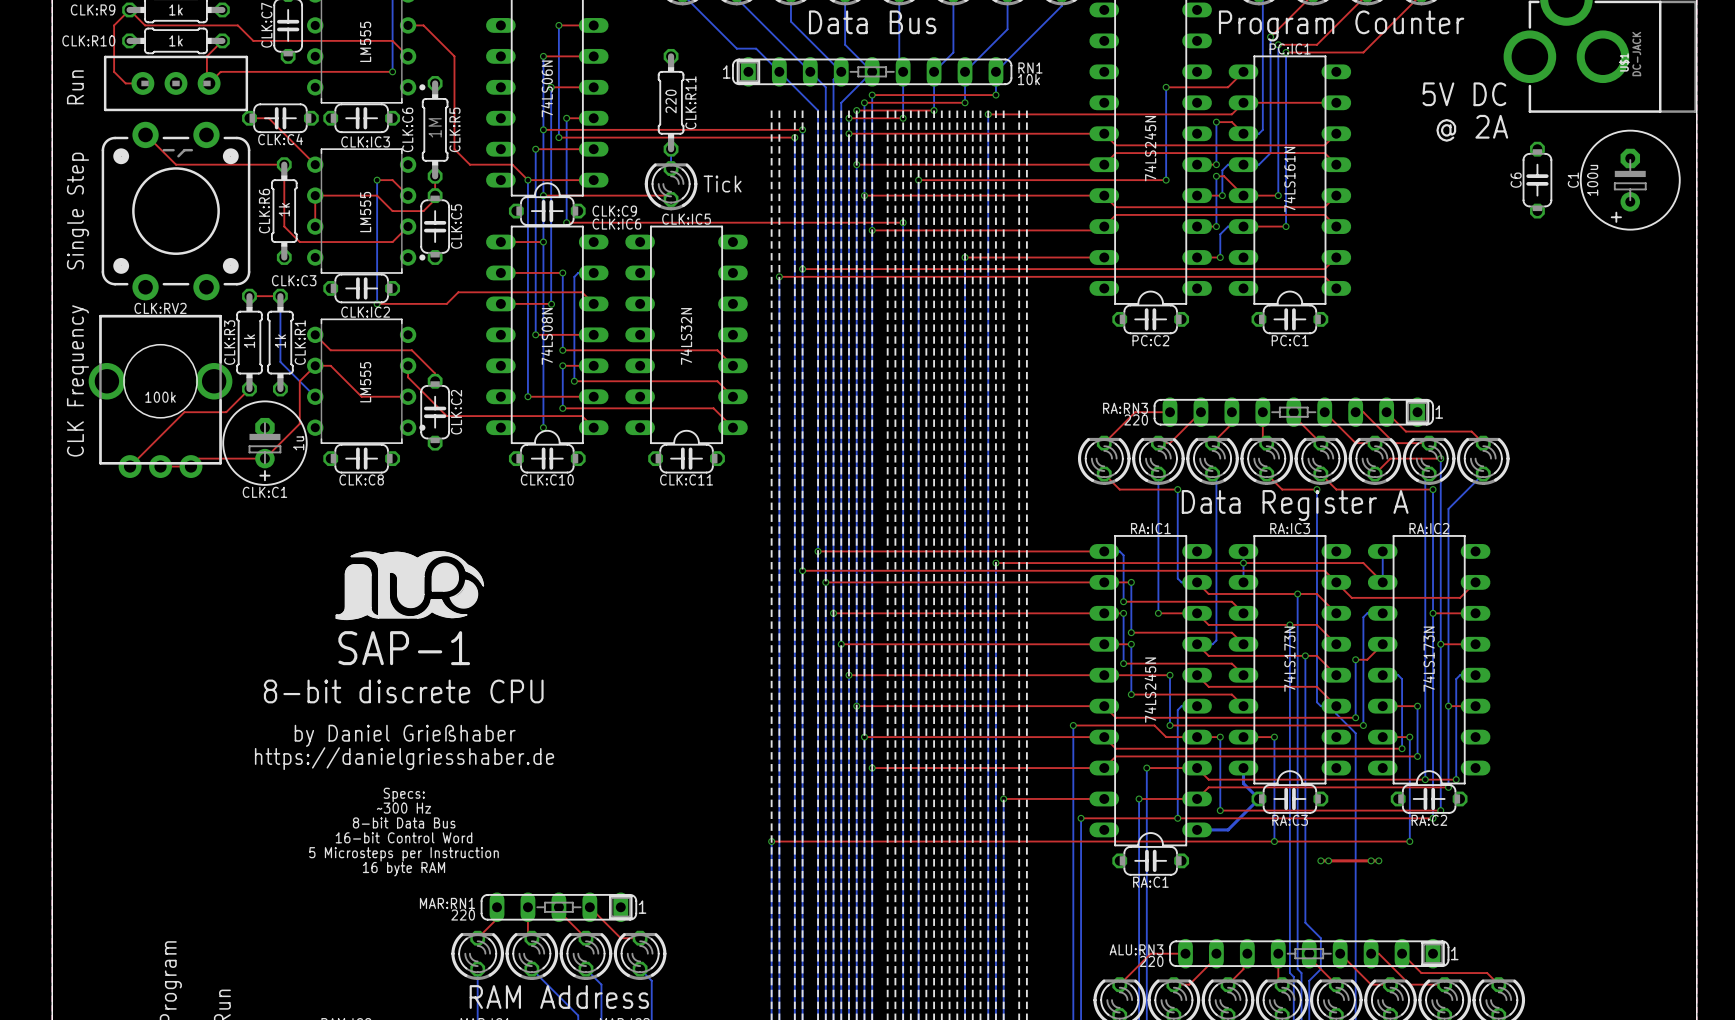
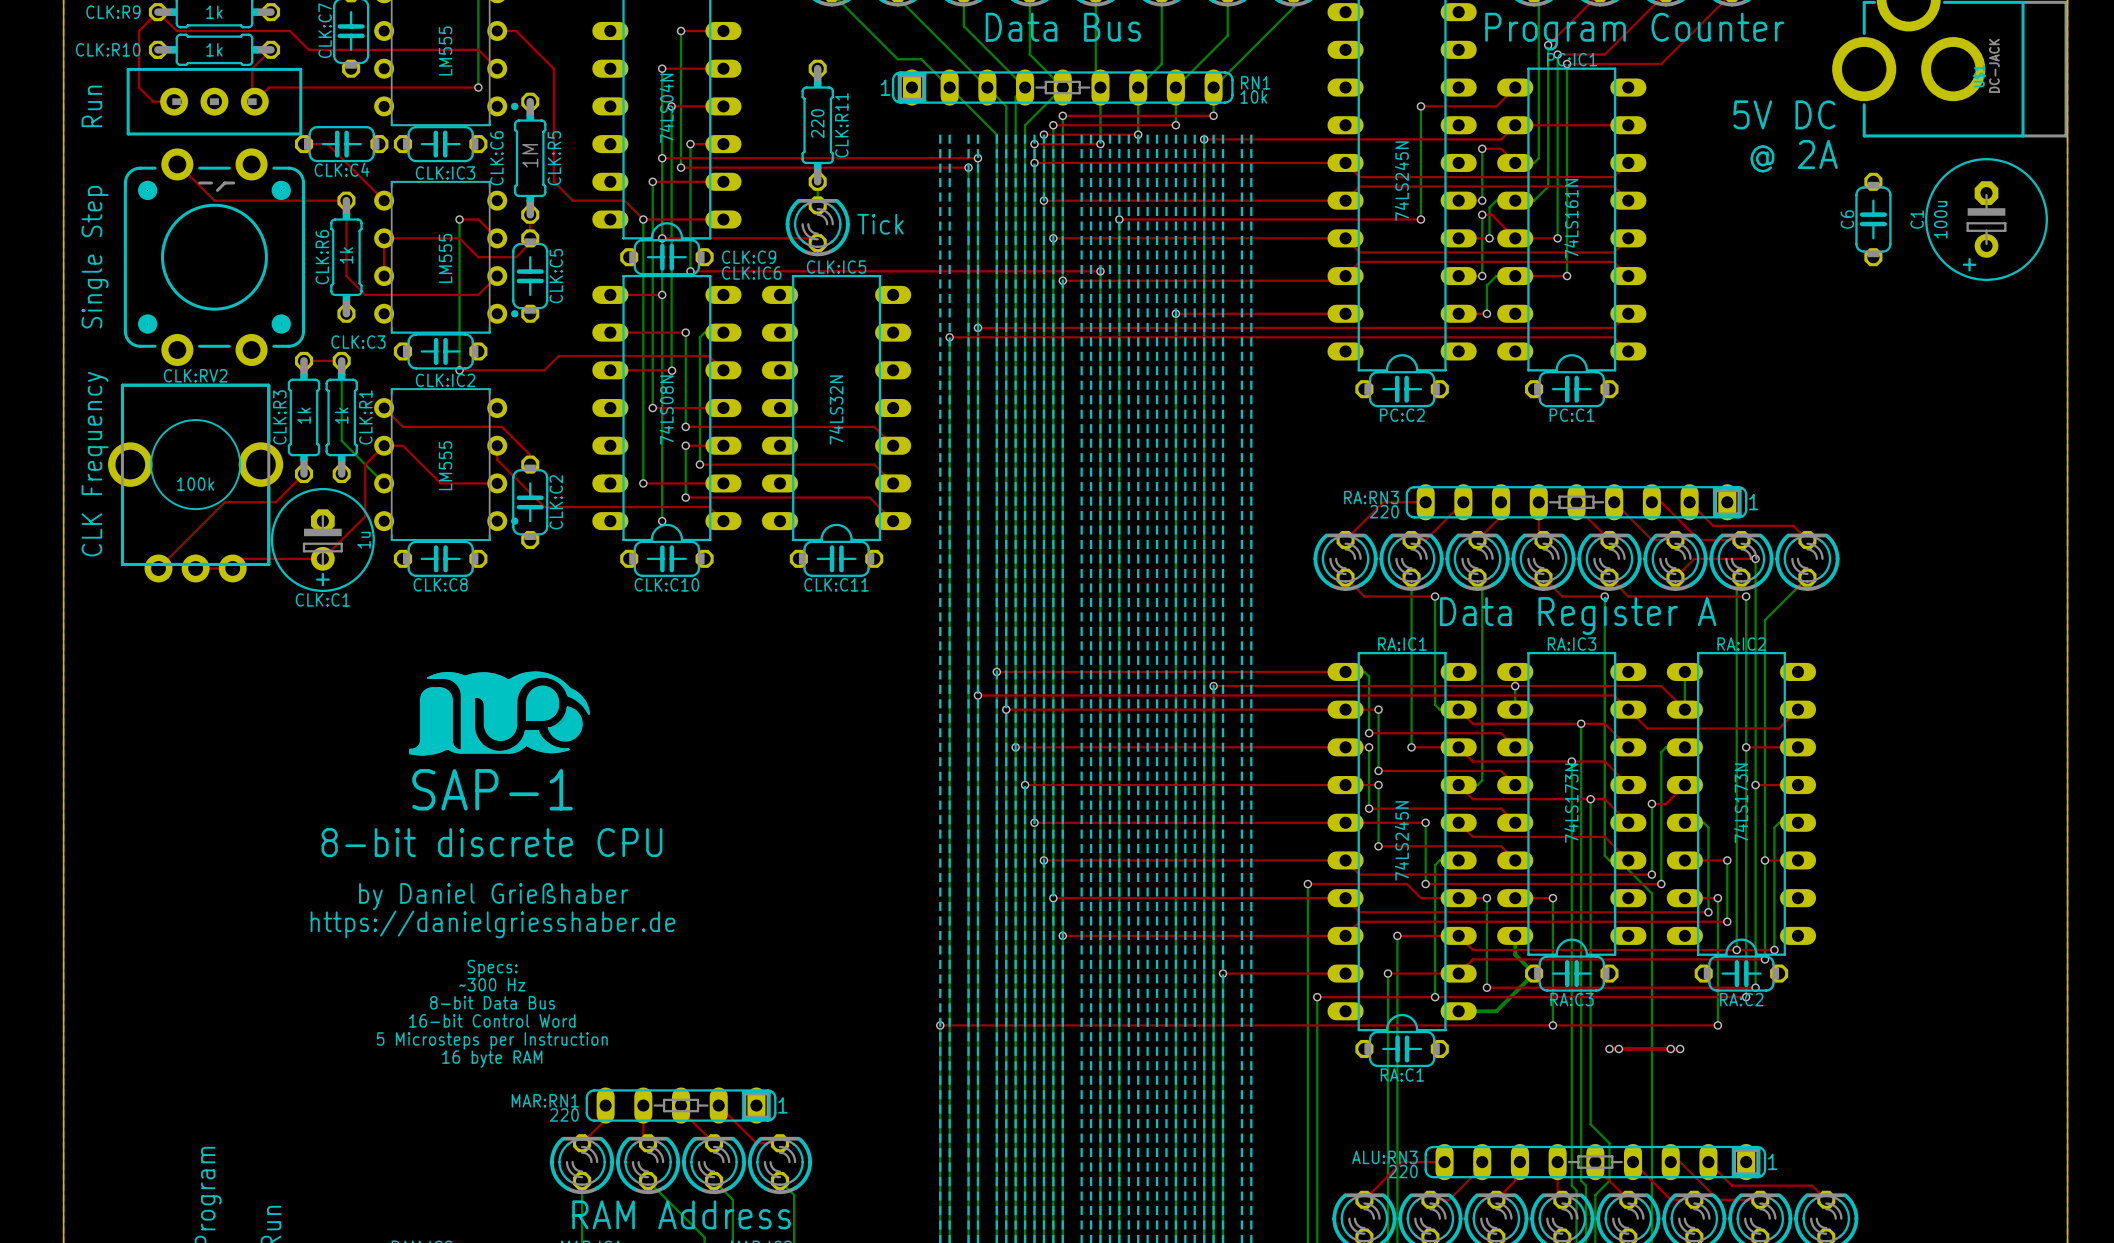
part value: 74LS06N (547, 88) -> 74LS04N (666, 108)

